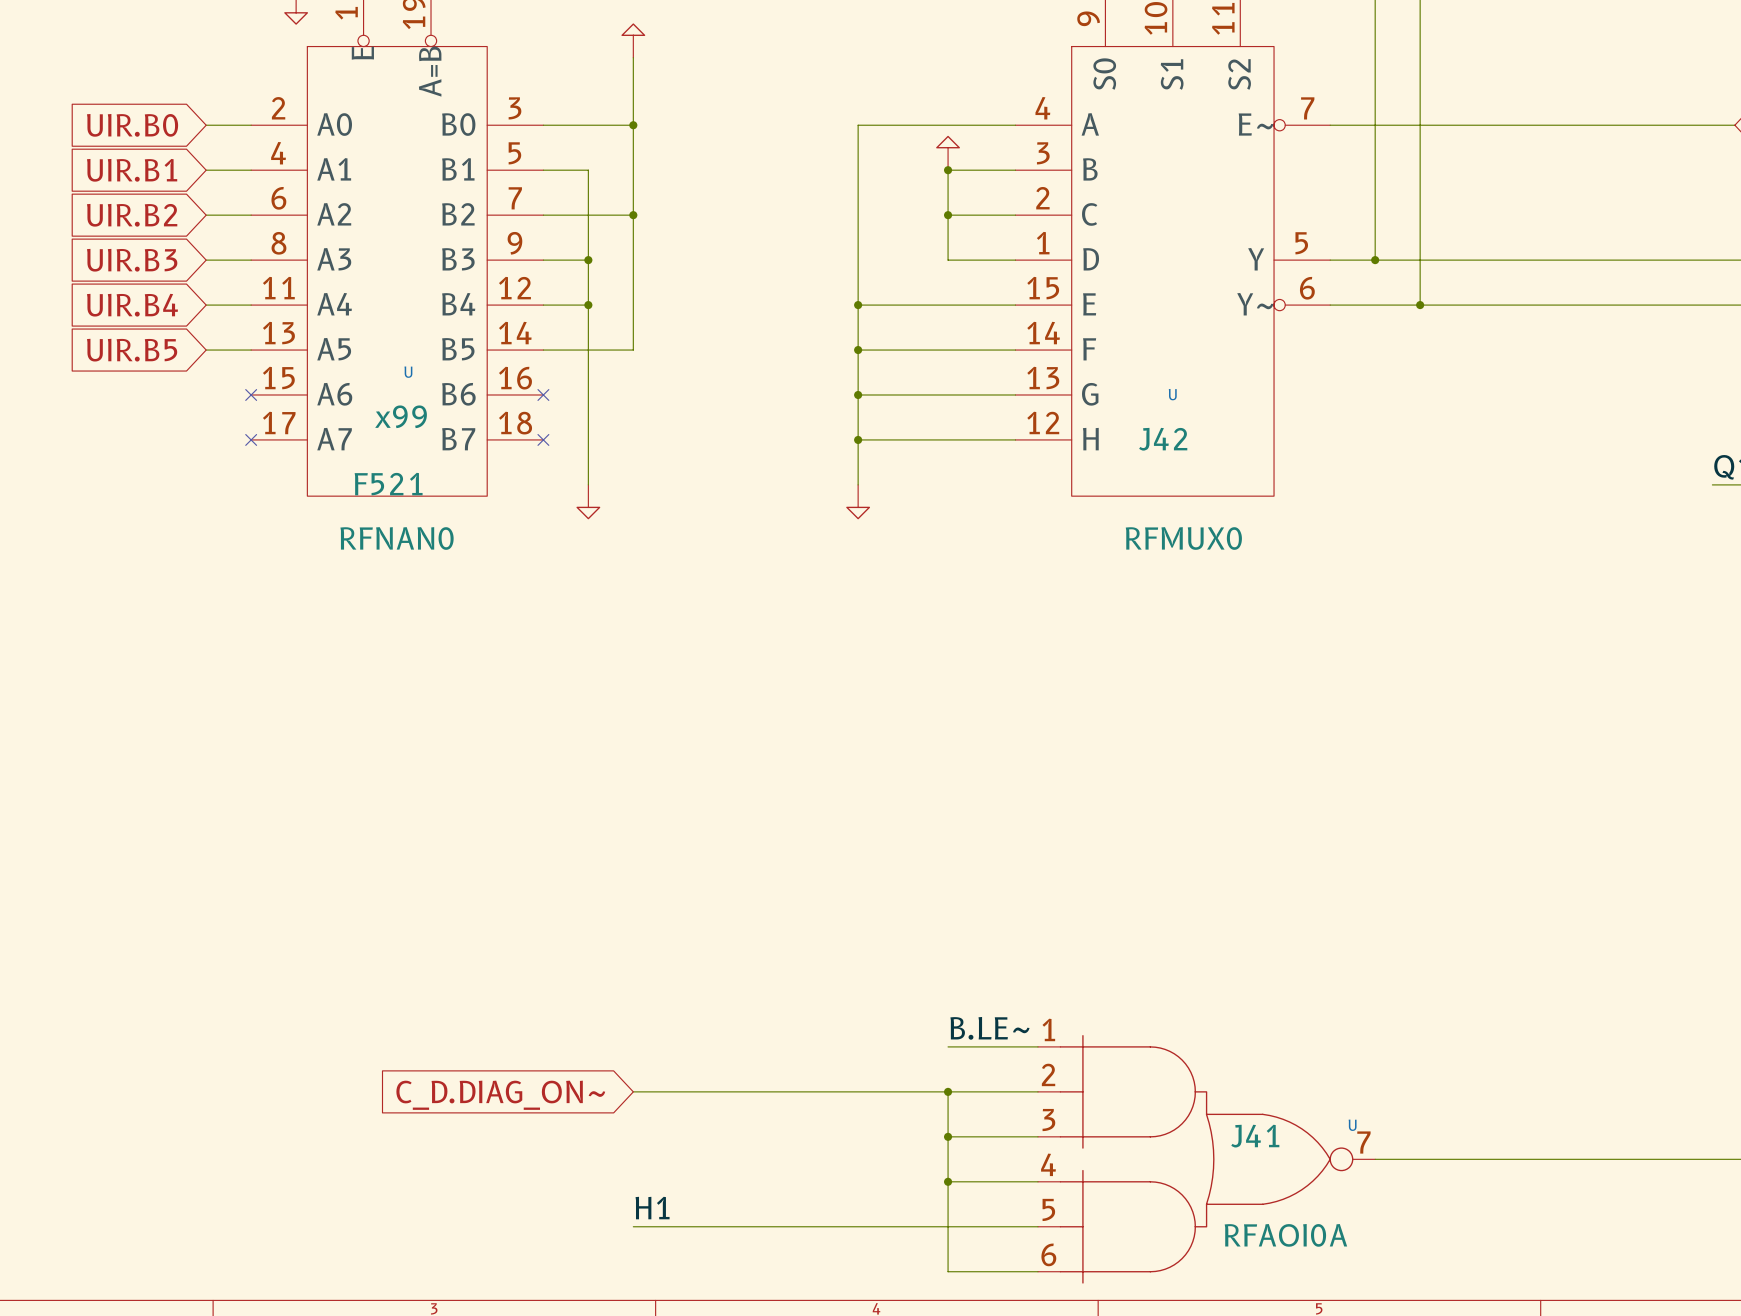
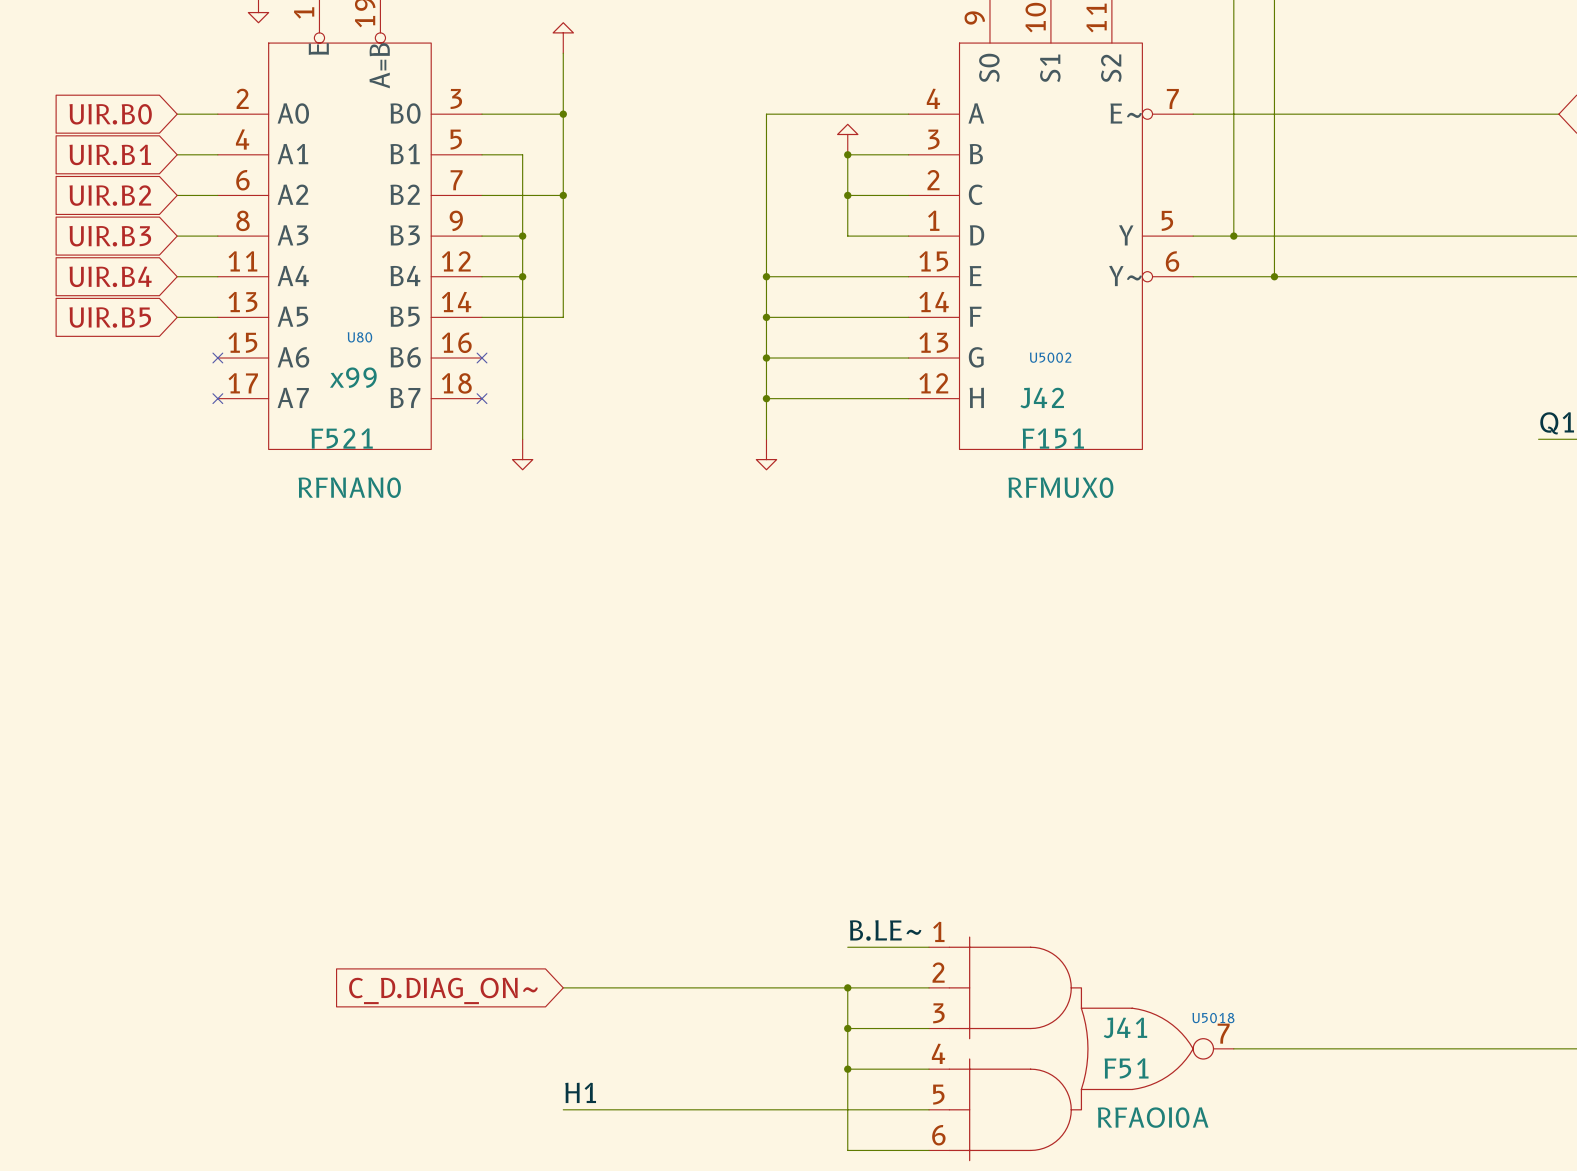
U name: U (408, 372) -> U80 (359, 337)
U name: U (1172, 394) -> U5002 (1050, 357)
U value: none -> F151 (1053, 438)
U name: U (1352, 1125) -> U5018 (1213, 1018)
U value: none -> F51 (1126, 1068)

